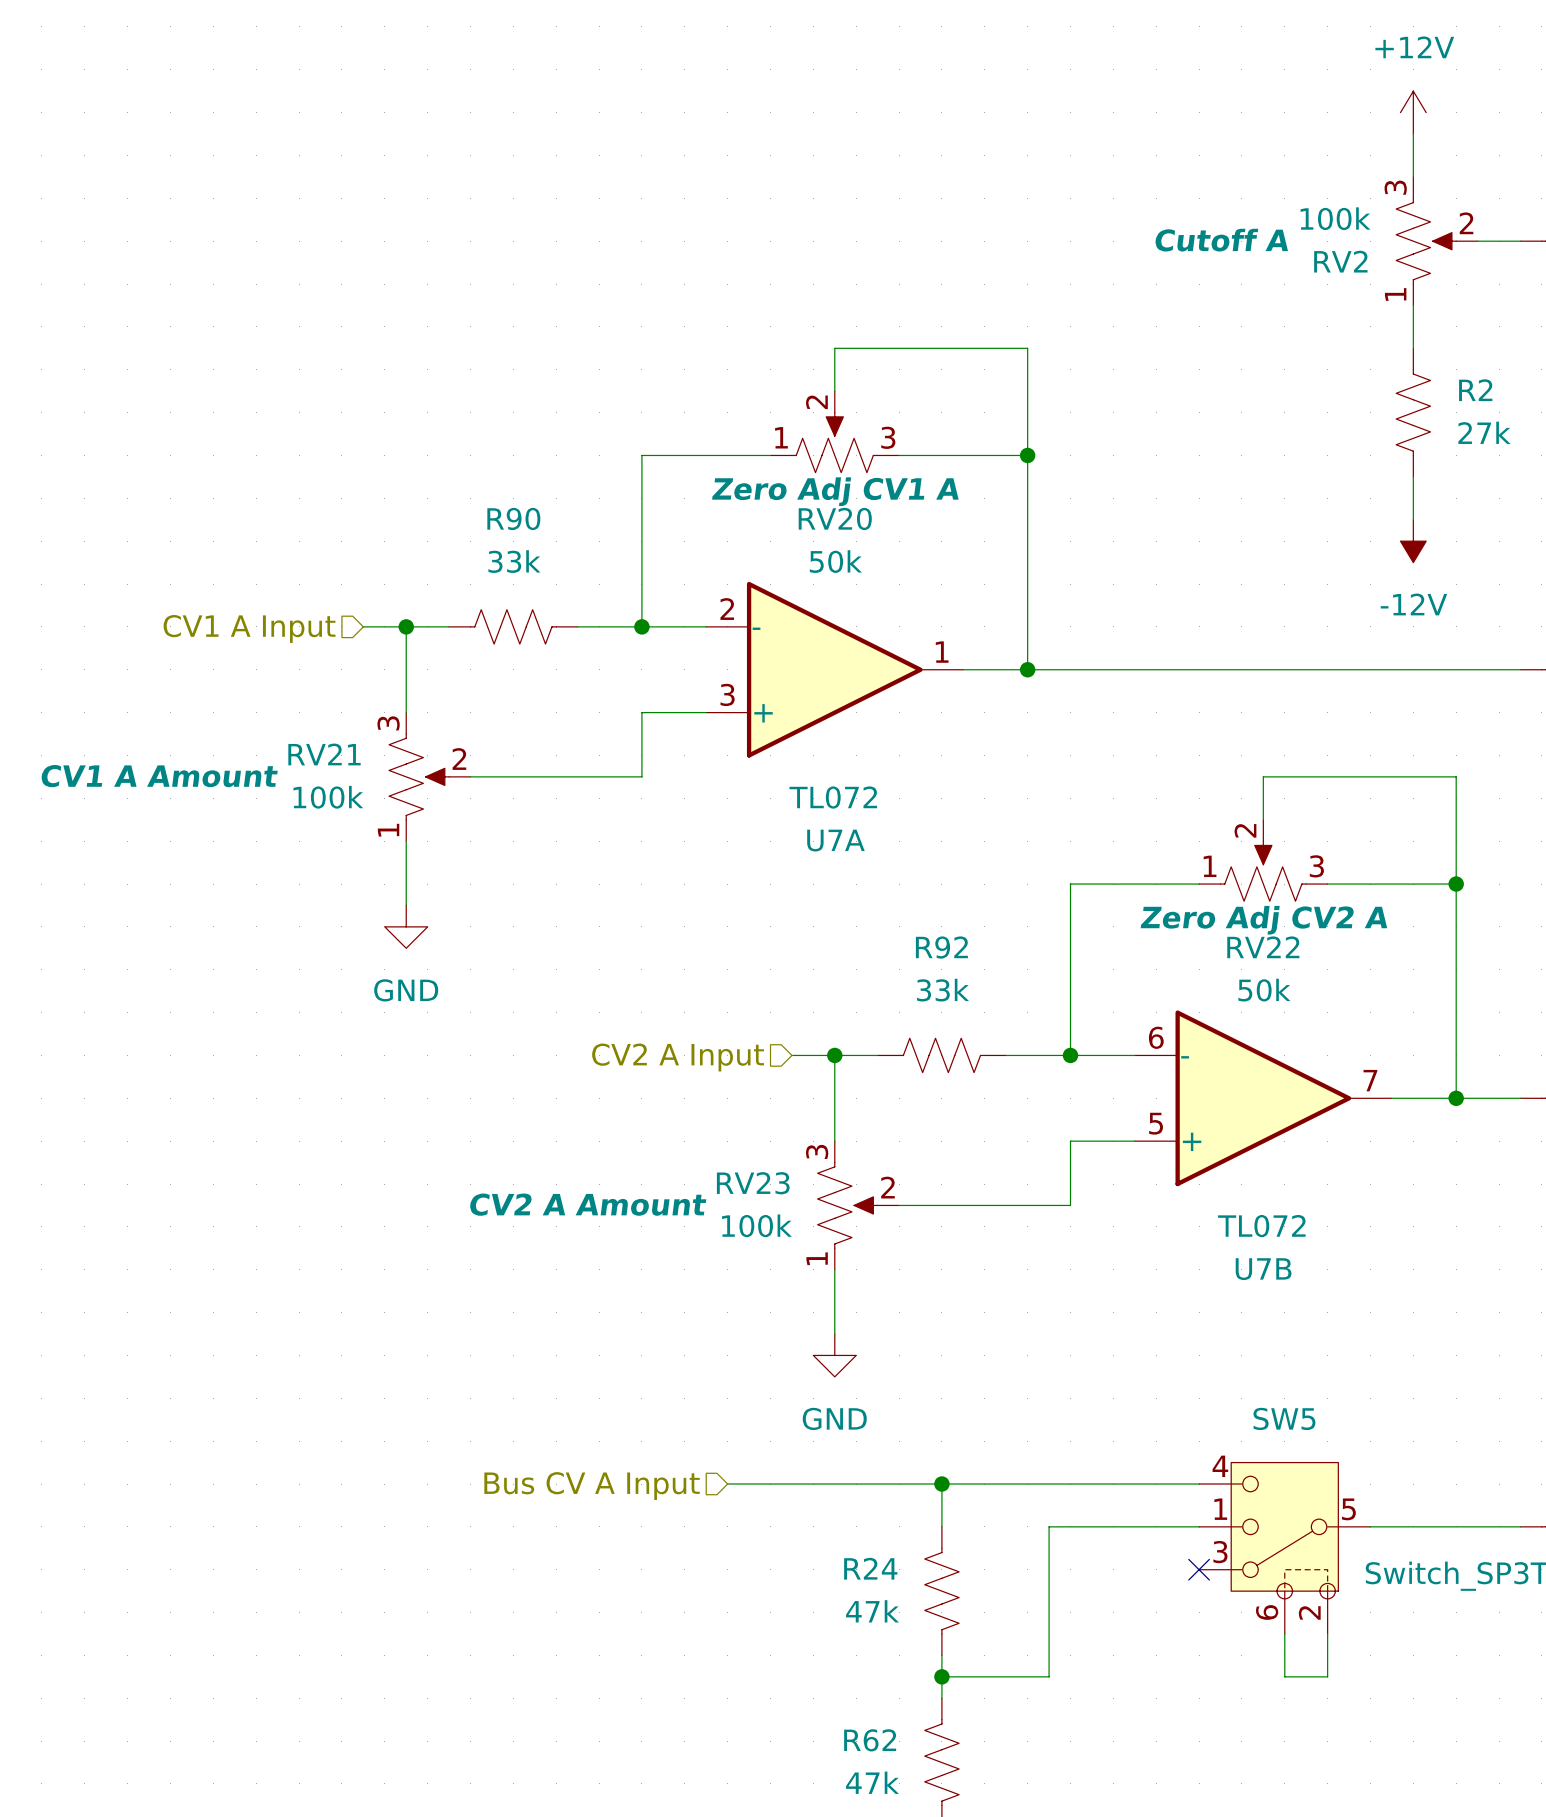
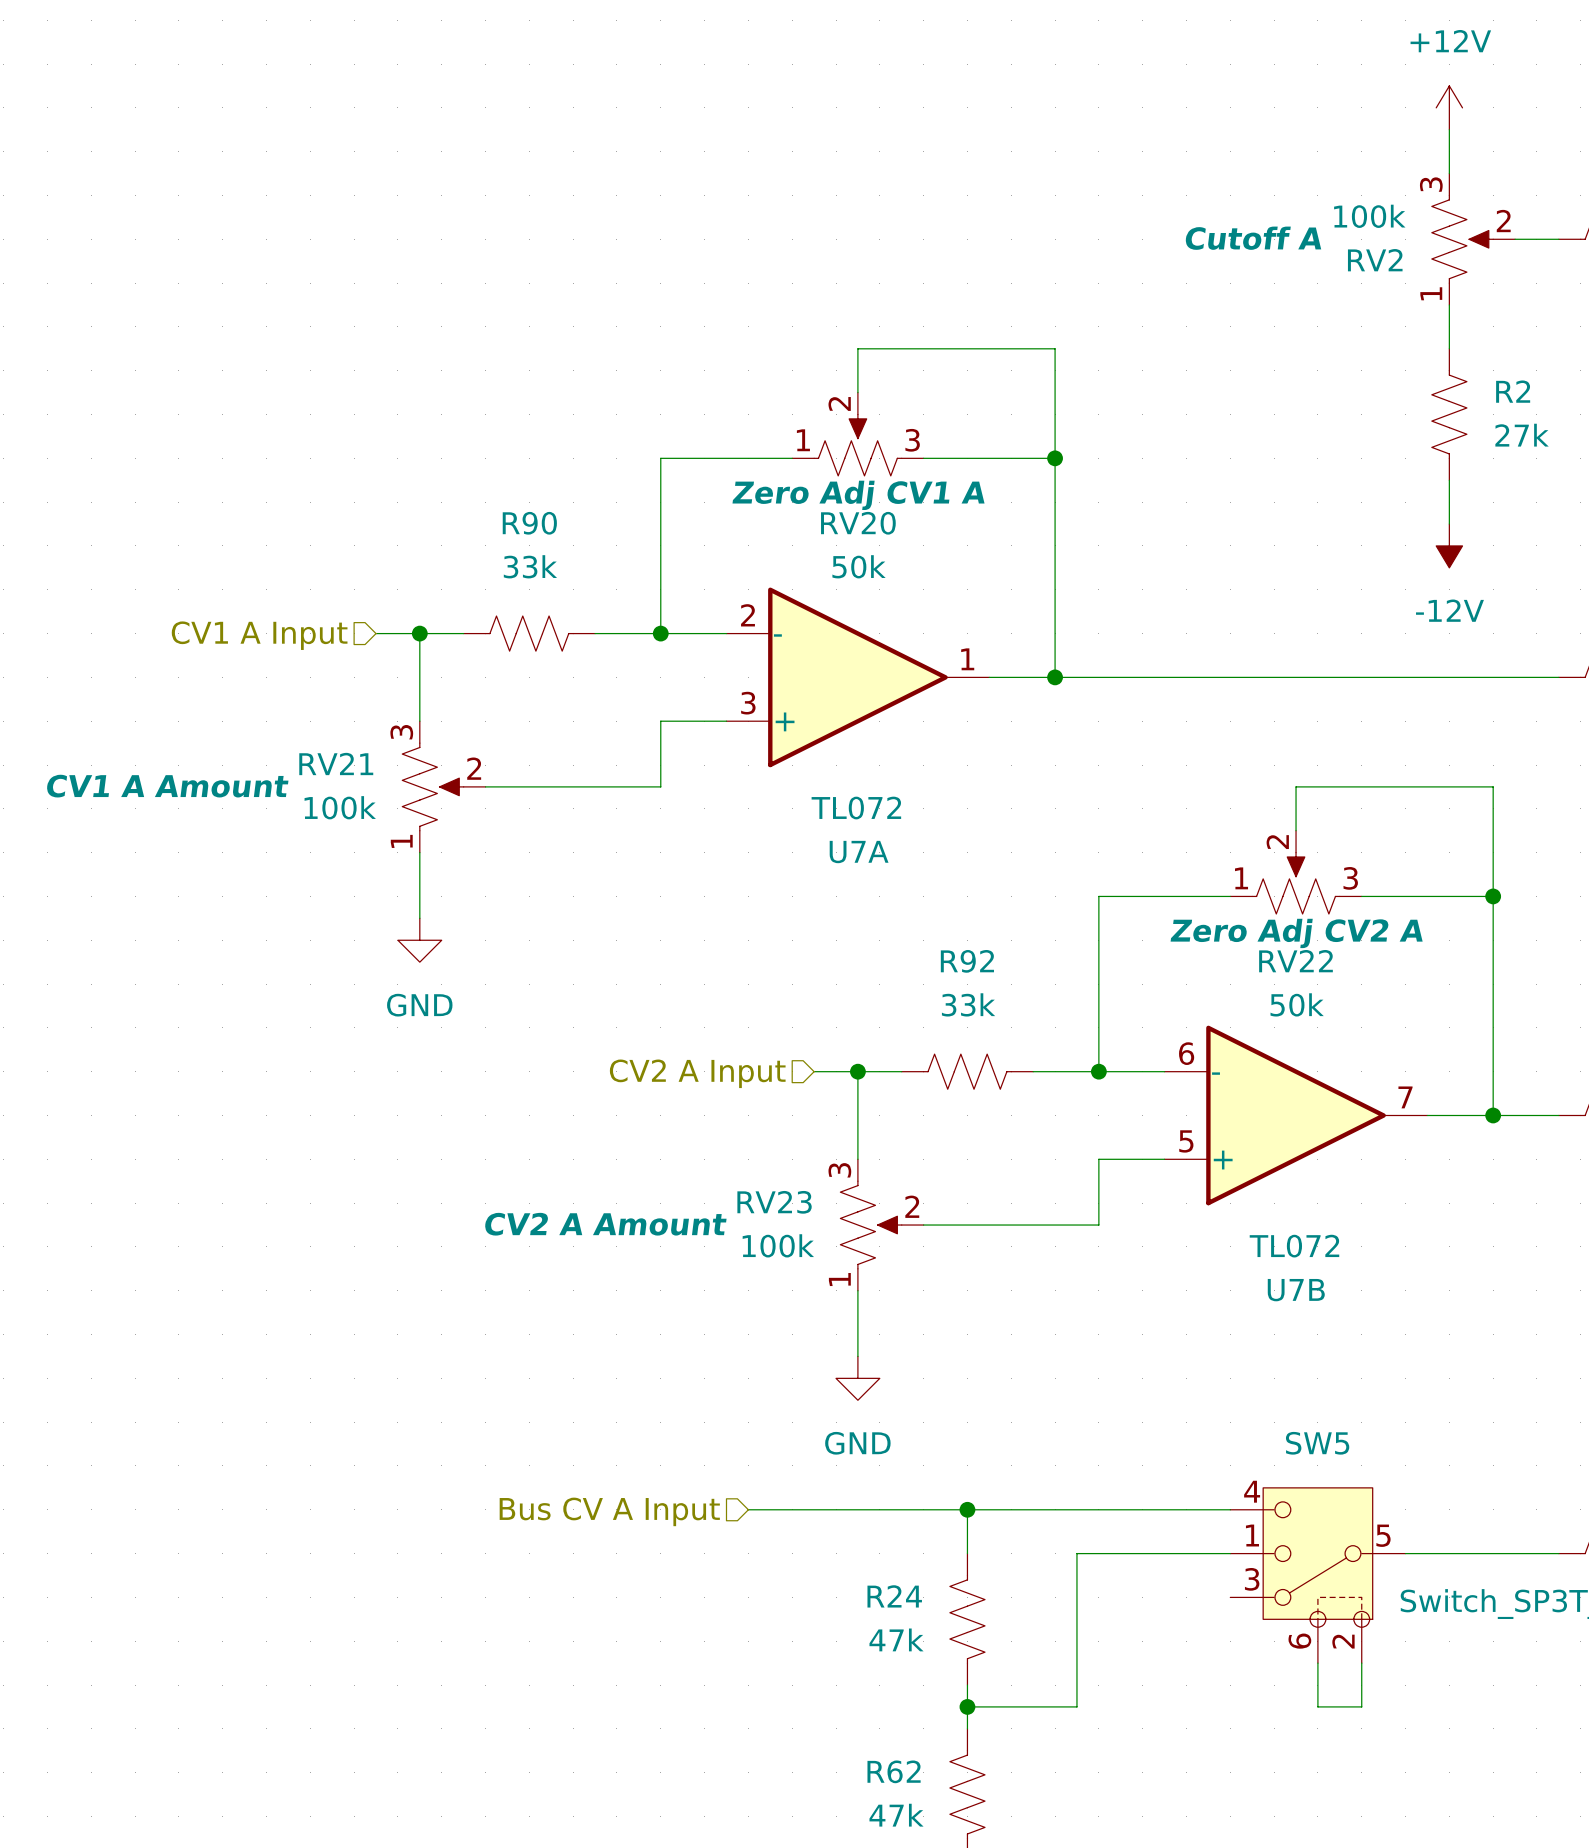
no-connect mark: (1199, 1569) -> none

